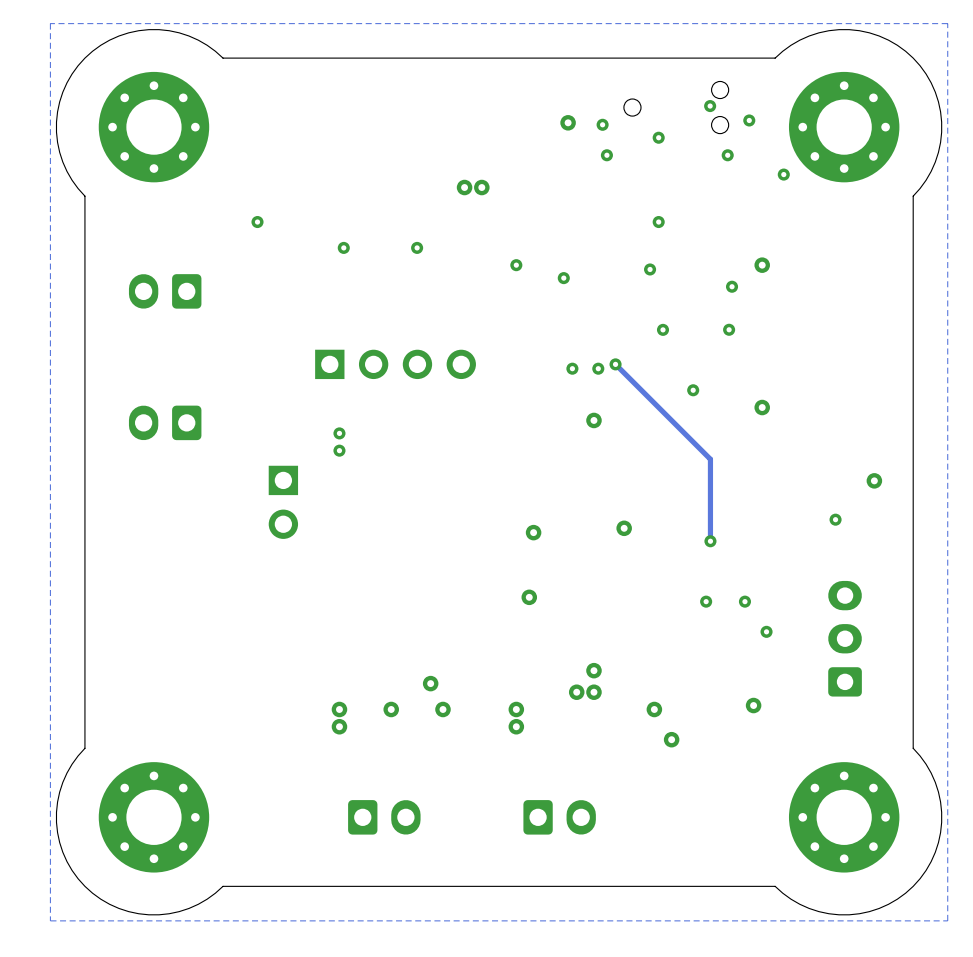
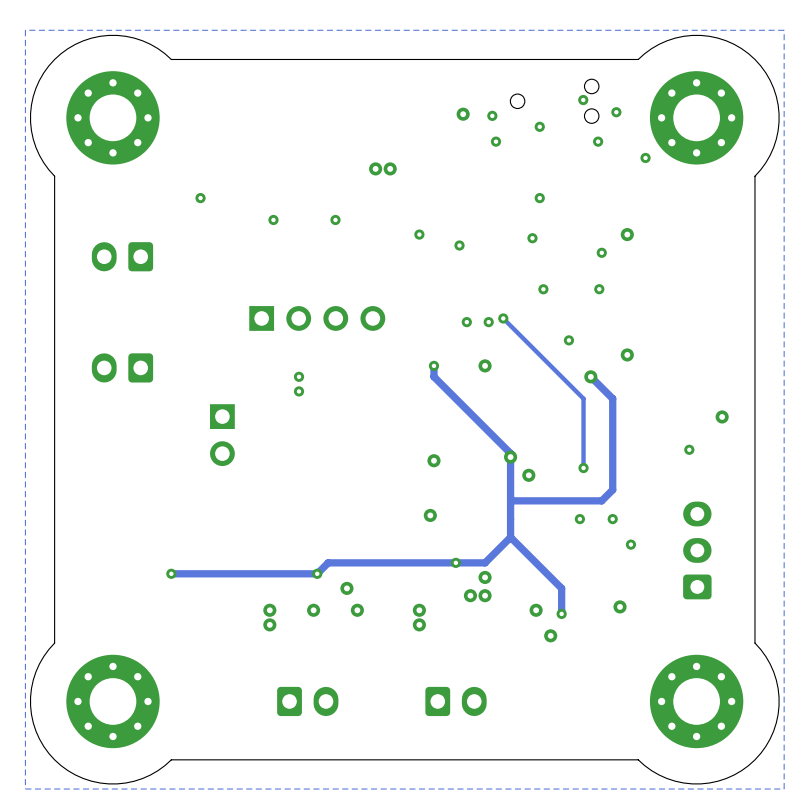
track: none -> (433, 365) (433, 376) (510, 453) (510, 537)
via: none -> (433, 365)
via: (339, 433) -> none
via: none -> (299, 376)
track: none -> (590, 376) (612, 398) (612, 489) (601, 500) (510, 500)
via: none -> (590, 376)
via: (339, 450) -> none
via: none -> (299, 391)
via: none -> (528, 475)
track: none -> (510, 537) (485, 562) (328, 562) (317, 573) (171, 573)
track: none -> (510, 537) (561, 588) (561, 613)
via: none -> (455, 562)
via: none -> (171, 573)
via: none -> (317, 573)
via: none -> (561, 613)

